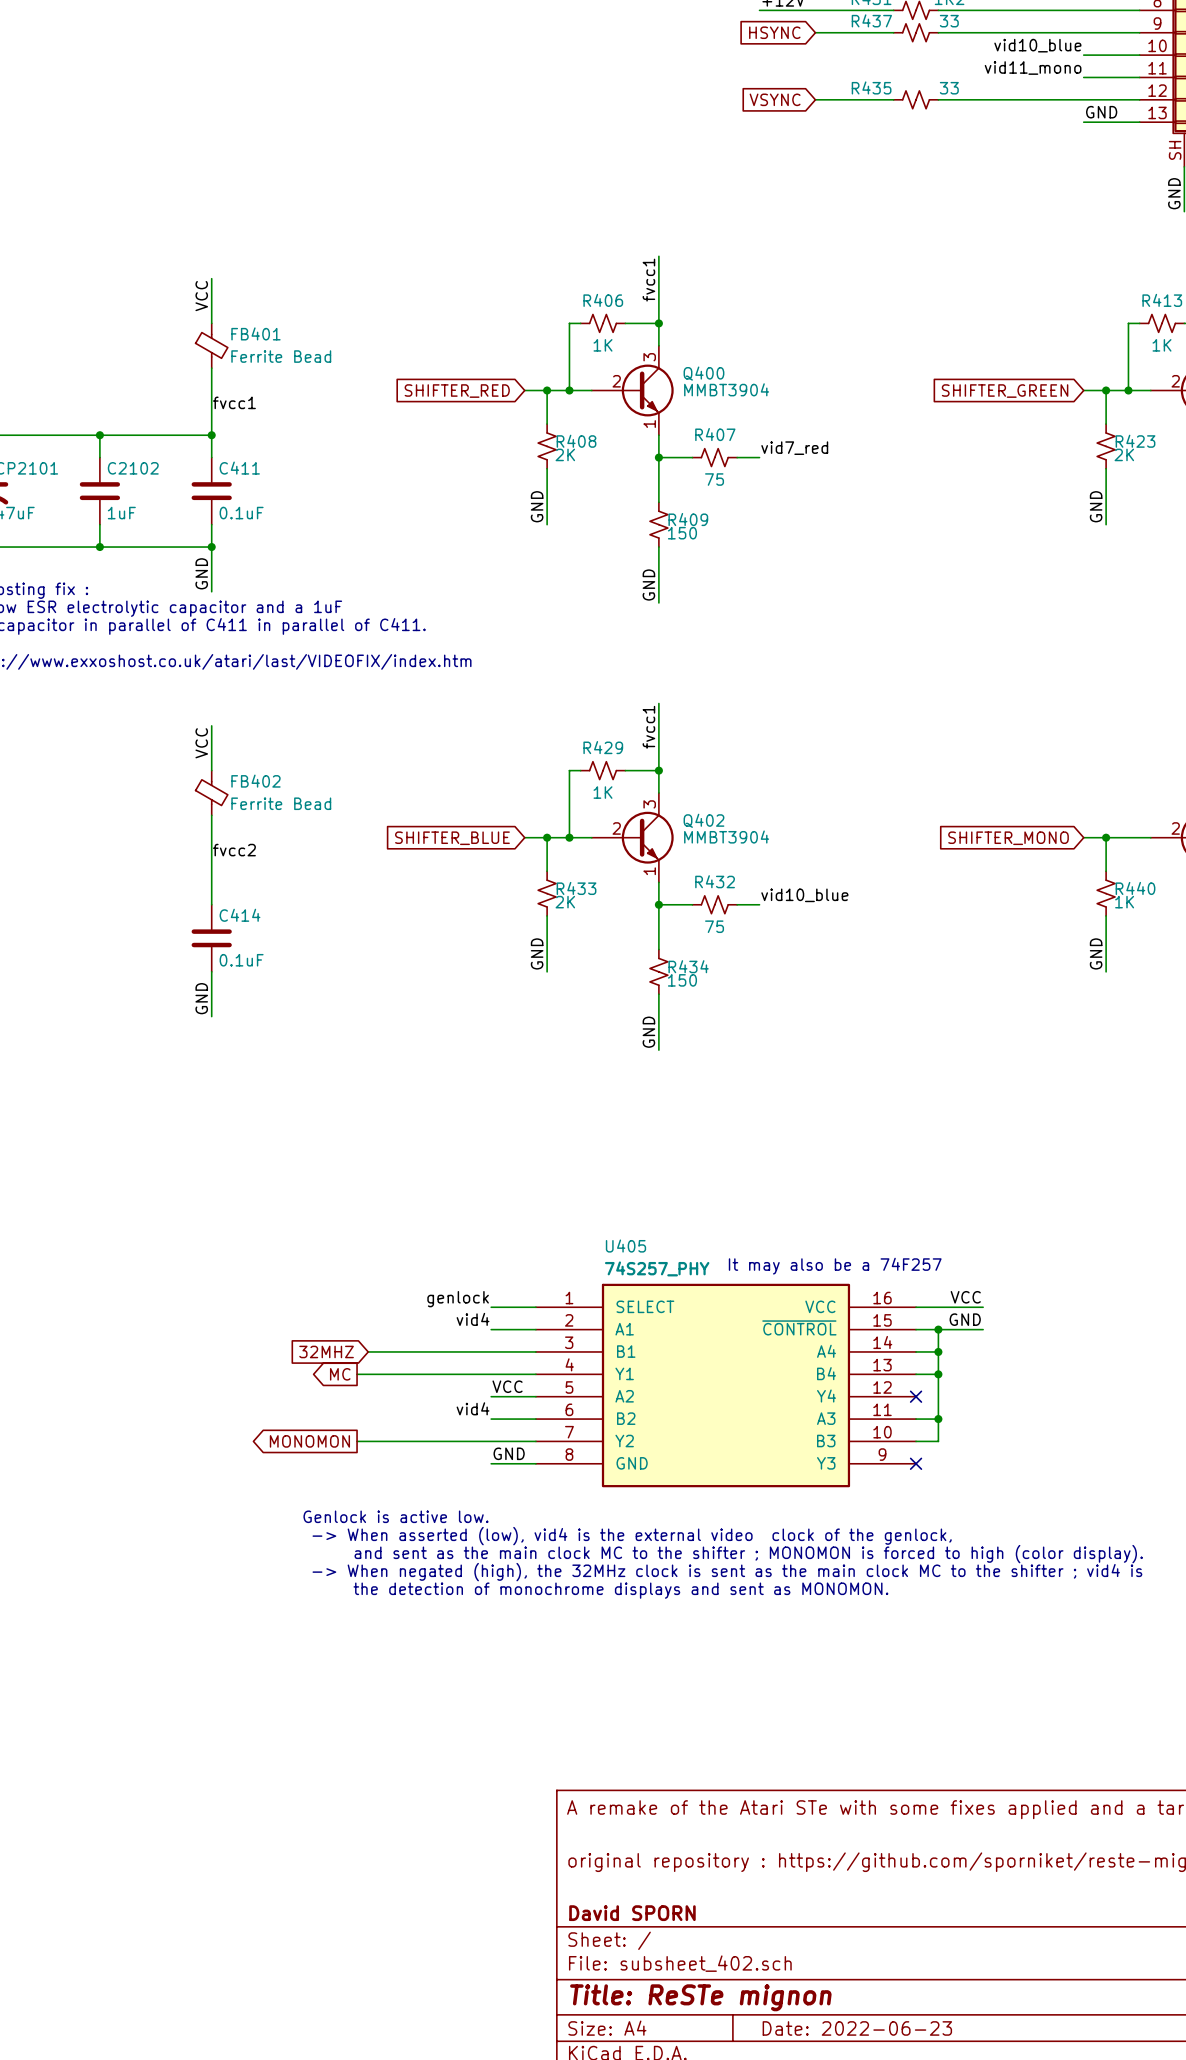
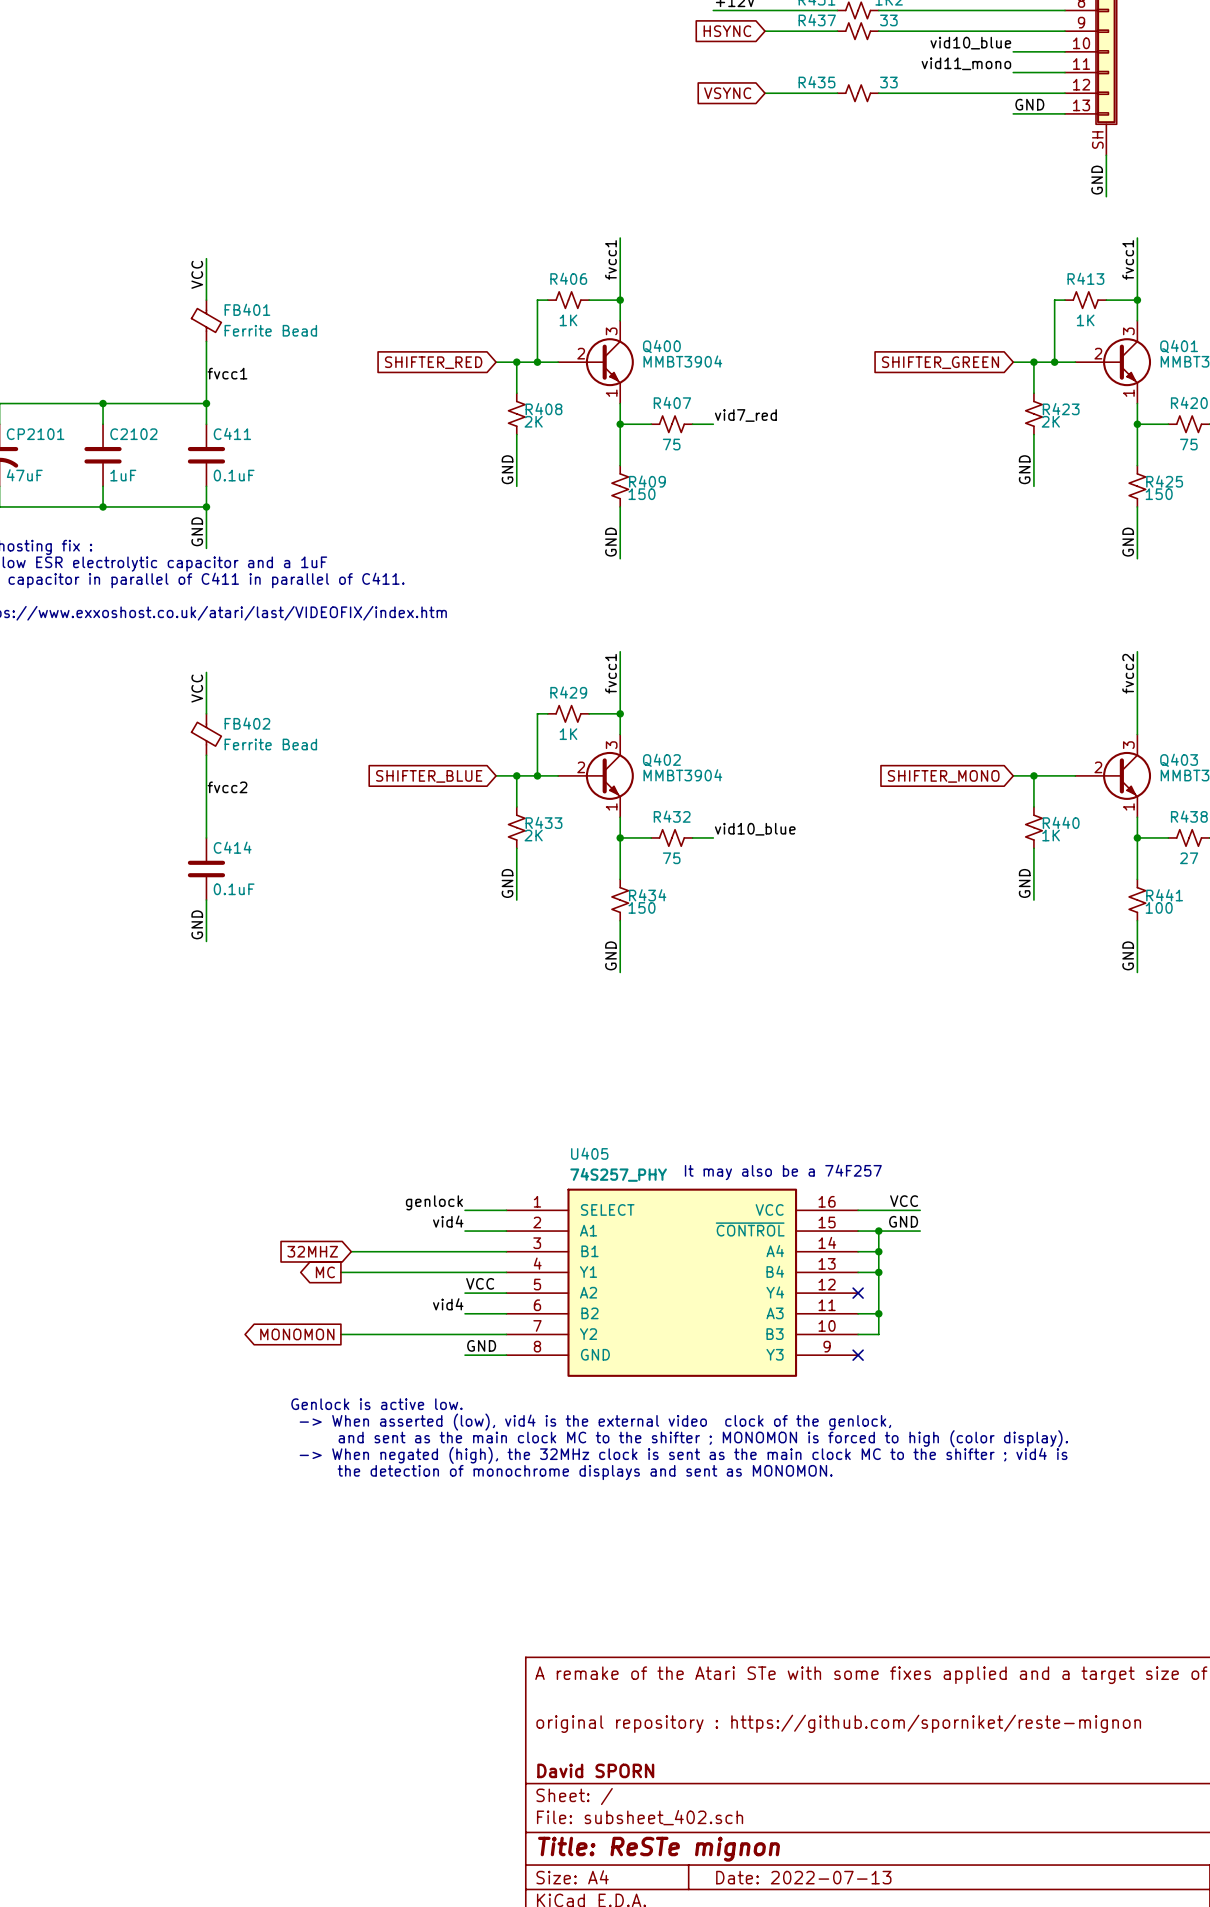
title block: Date: 2022-06-23 (857, 2028) -> Date: 2022-07-13 (803, 1877)

